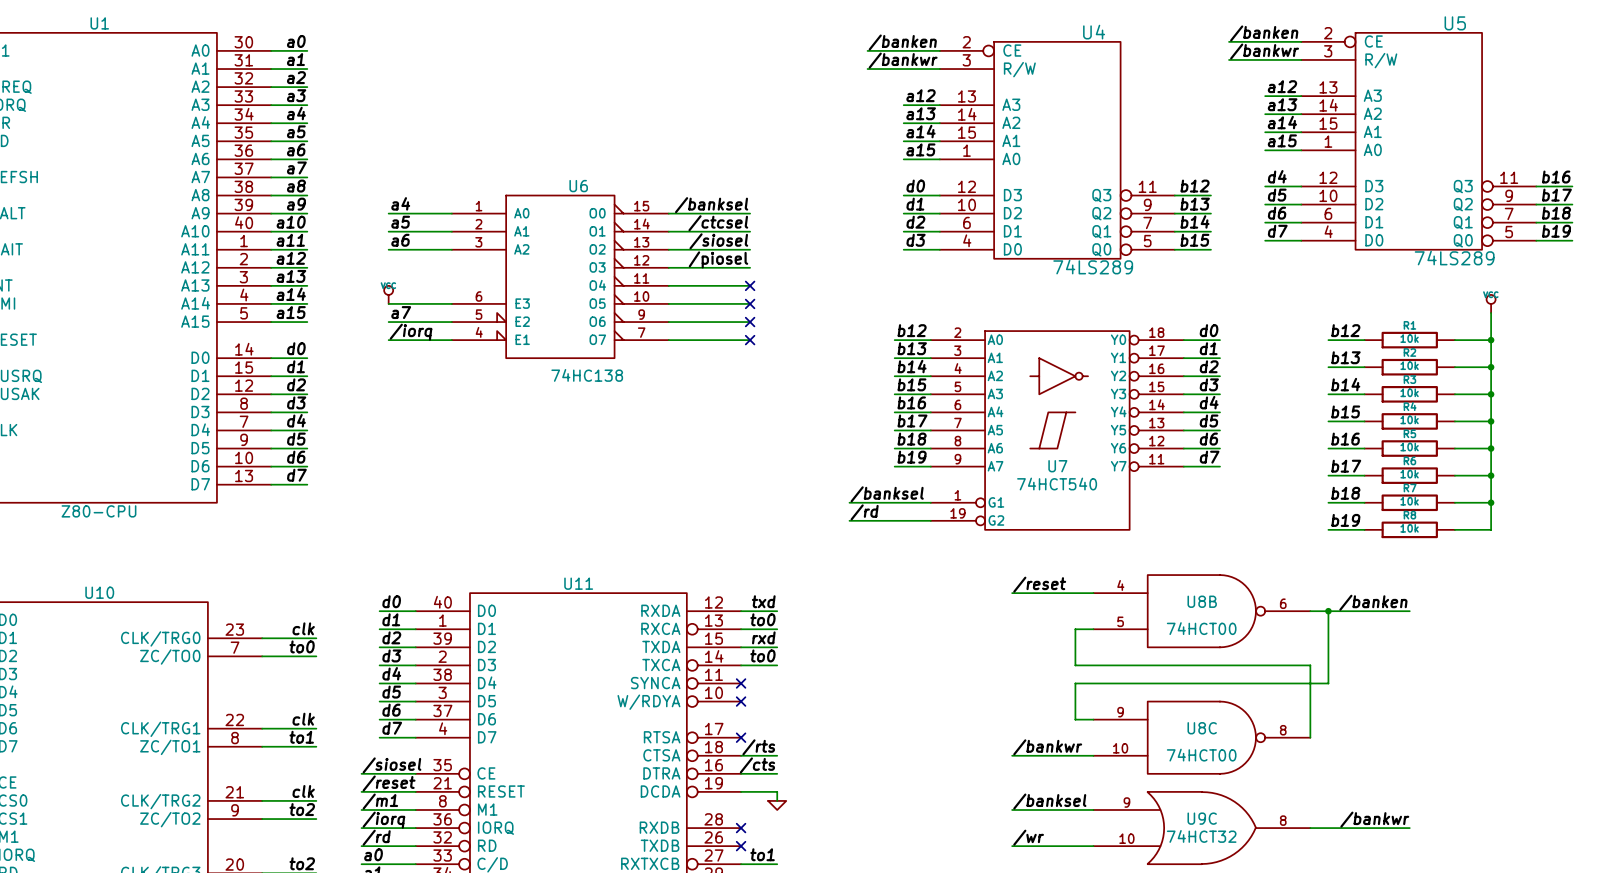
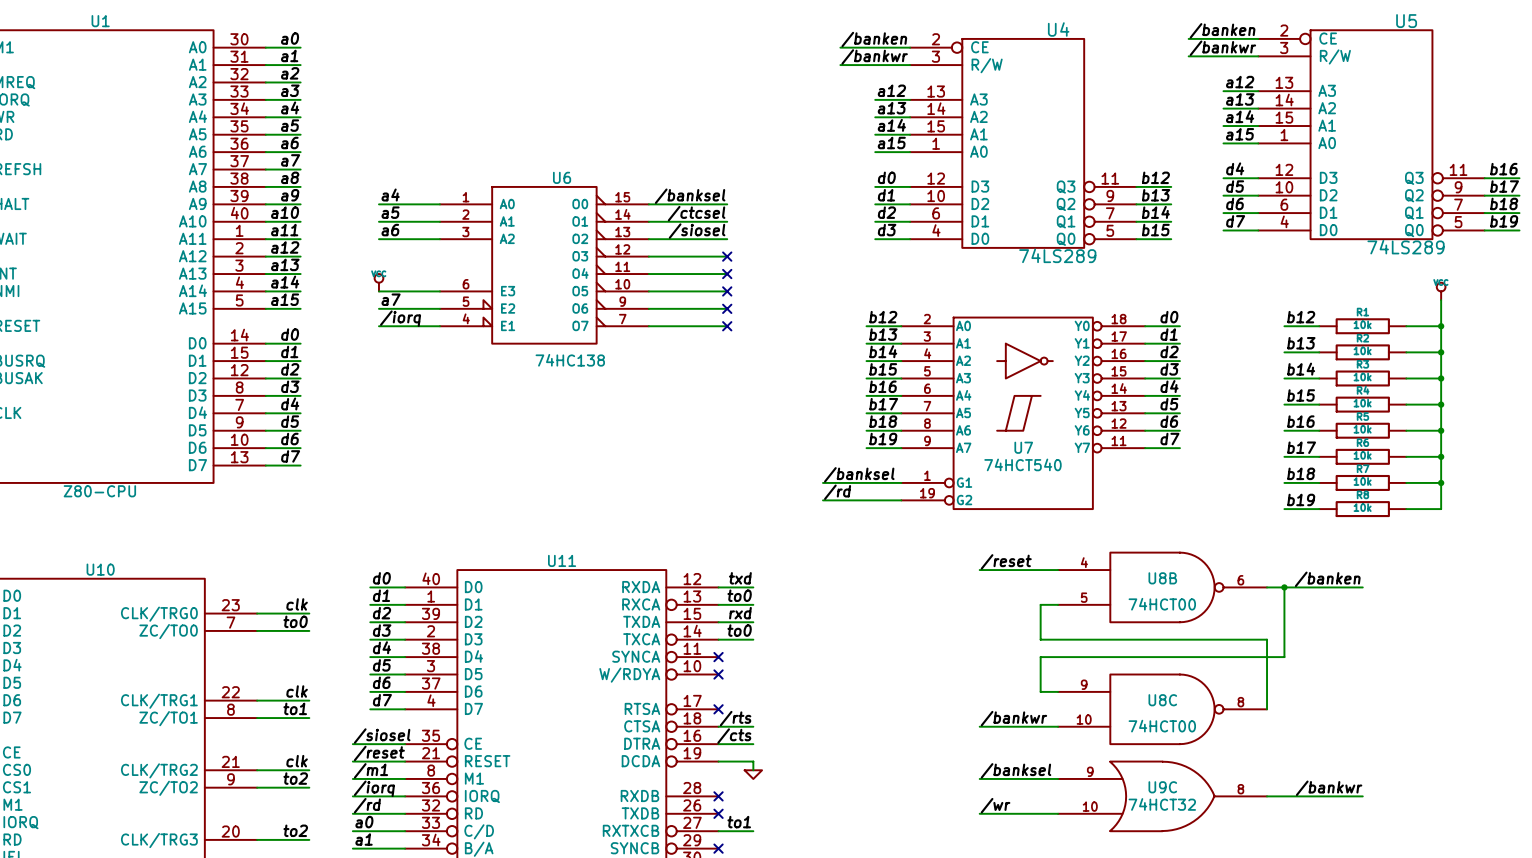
label: /piosel (718, 259) -> none
no-connect mark: none -> (727, 256)

